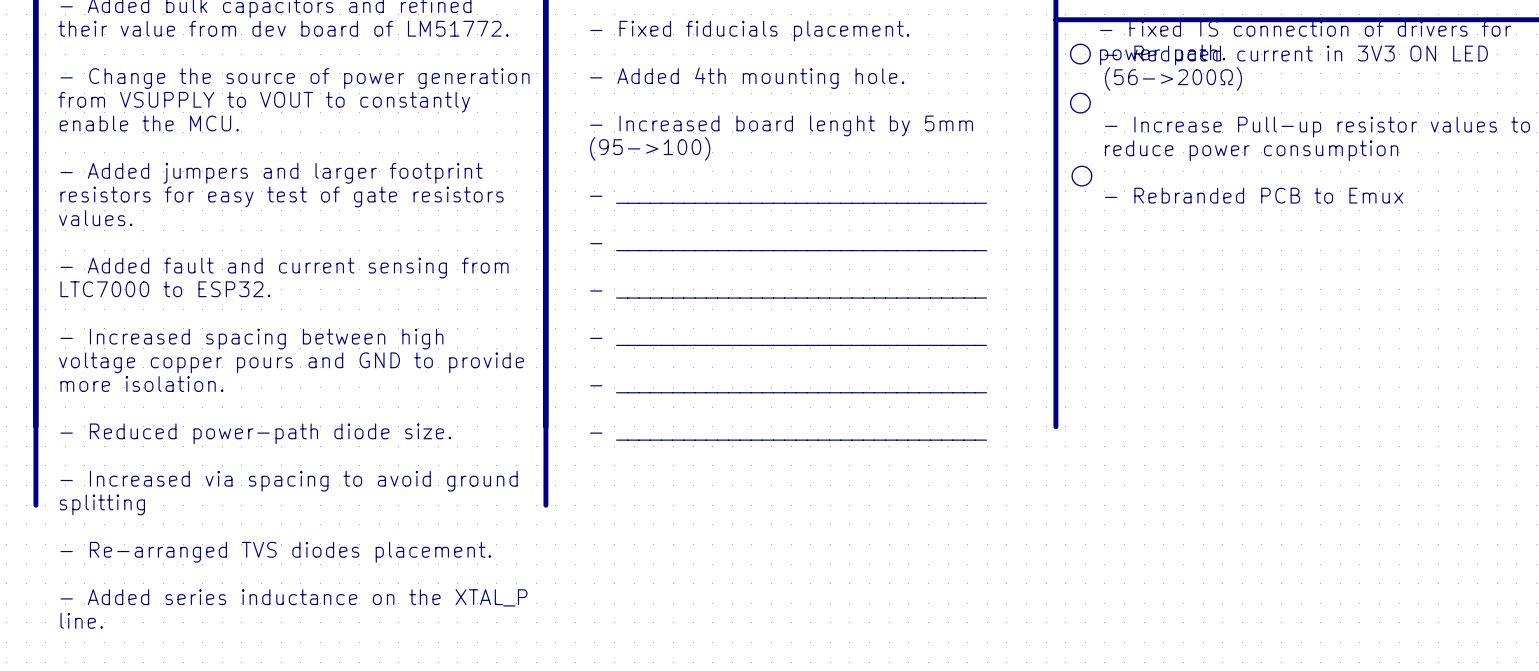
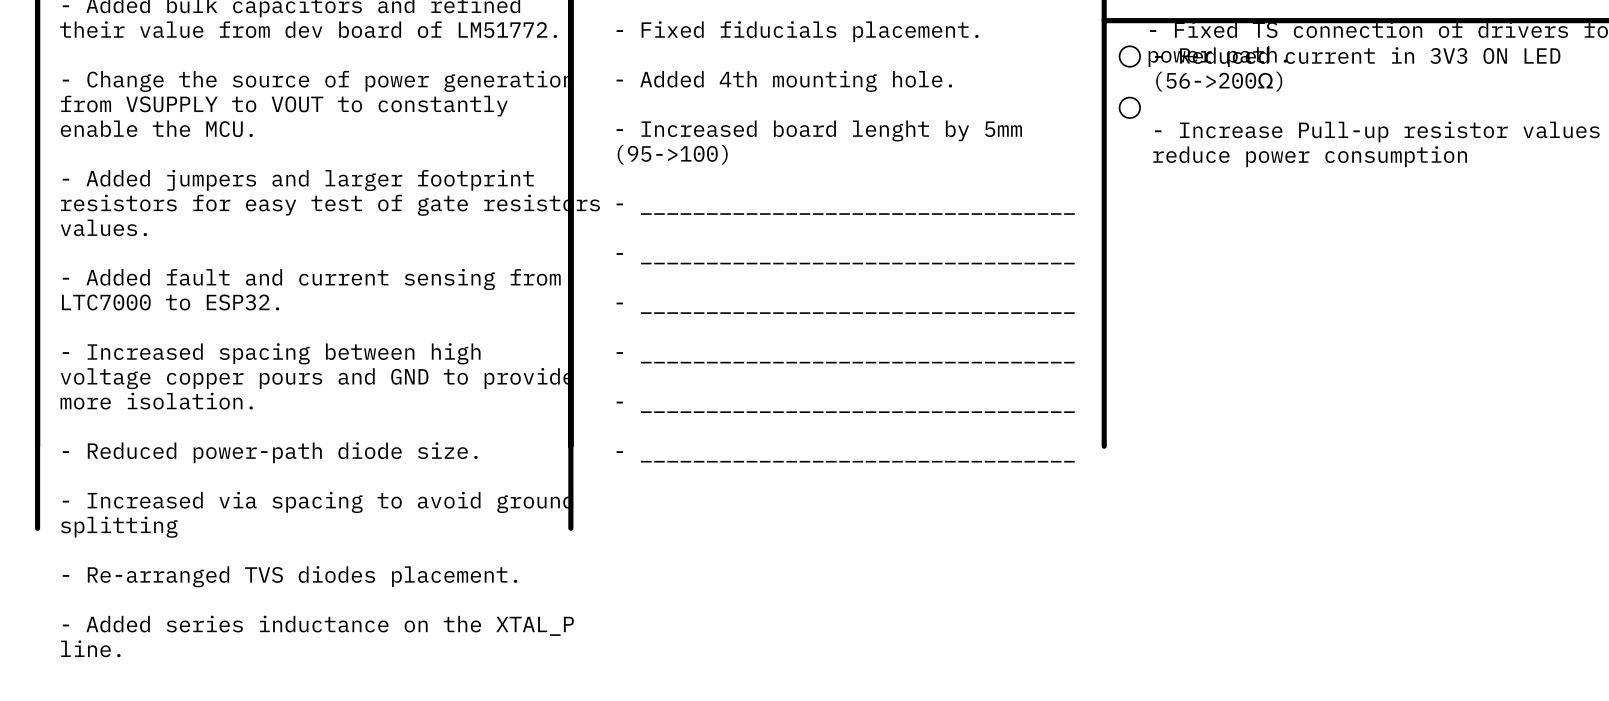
drawing: [1072, 166, 1092, 186] -> none
text: - Rebranded PCB to Emux (1254, 195) -> none

